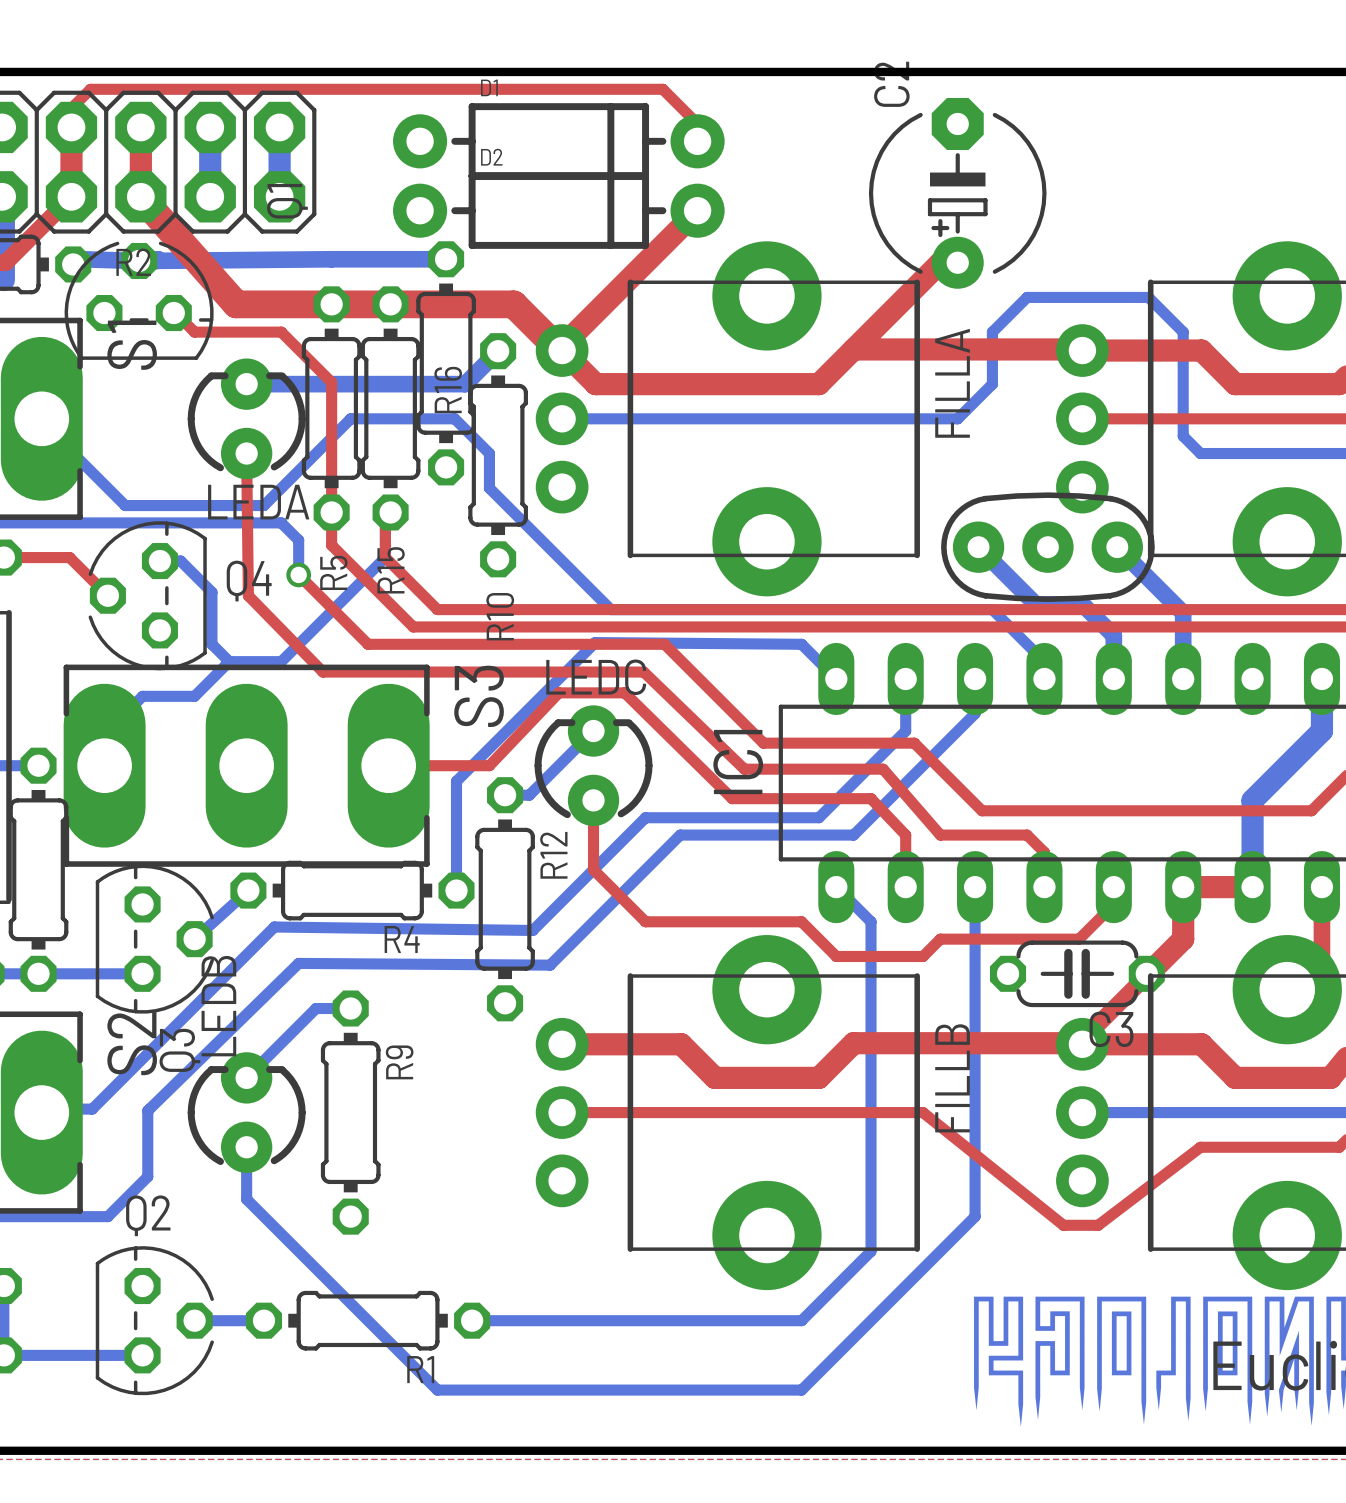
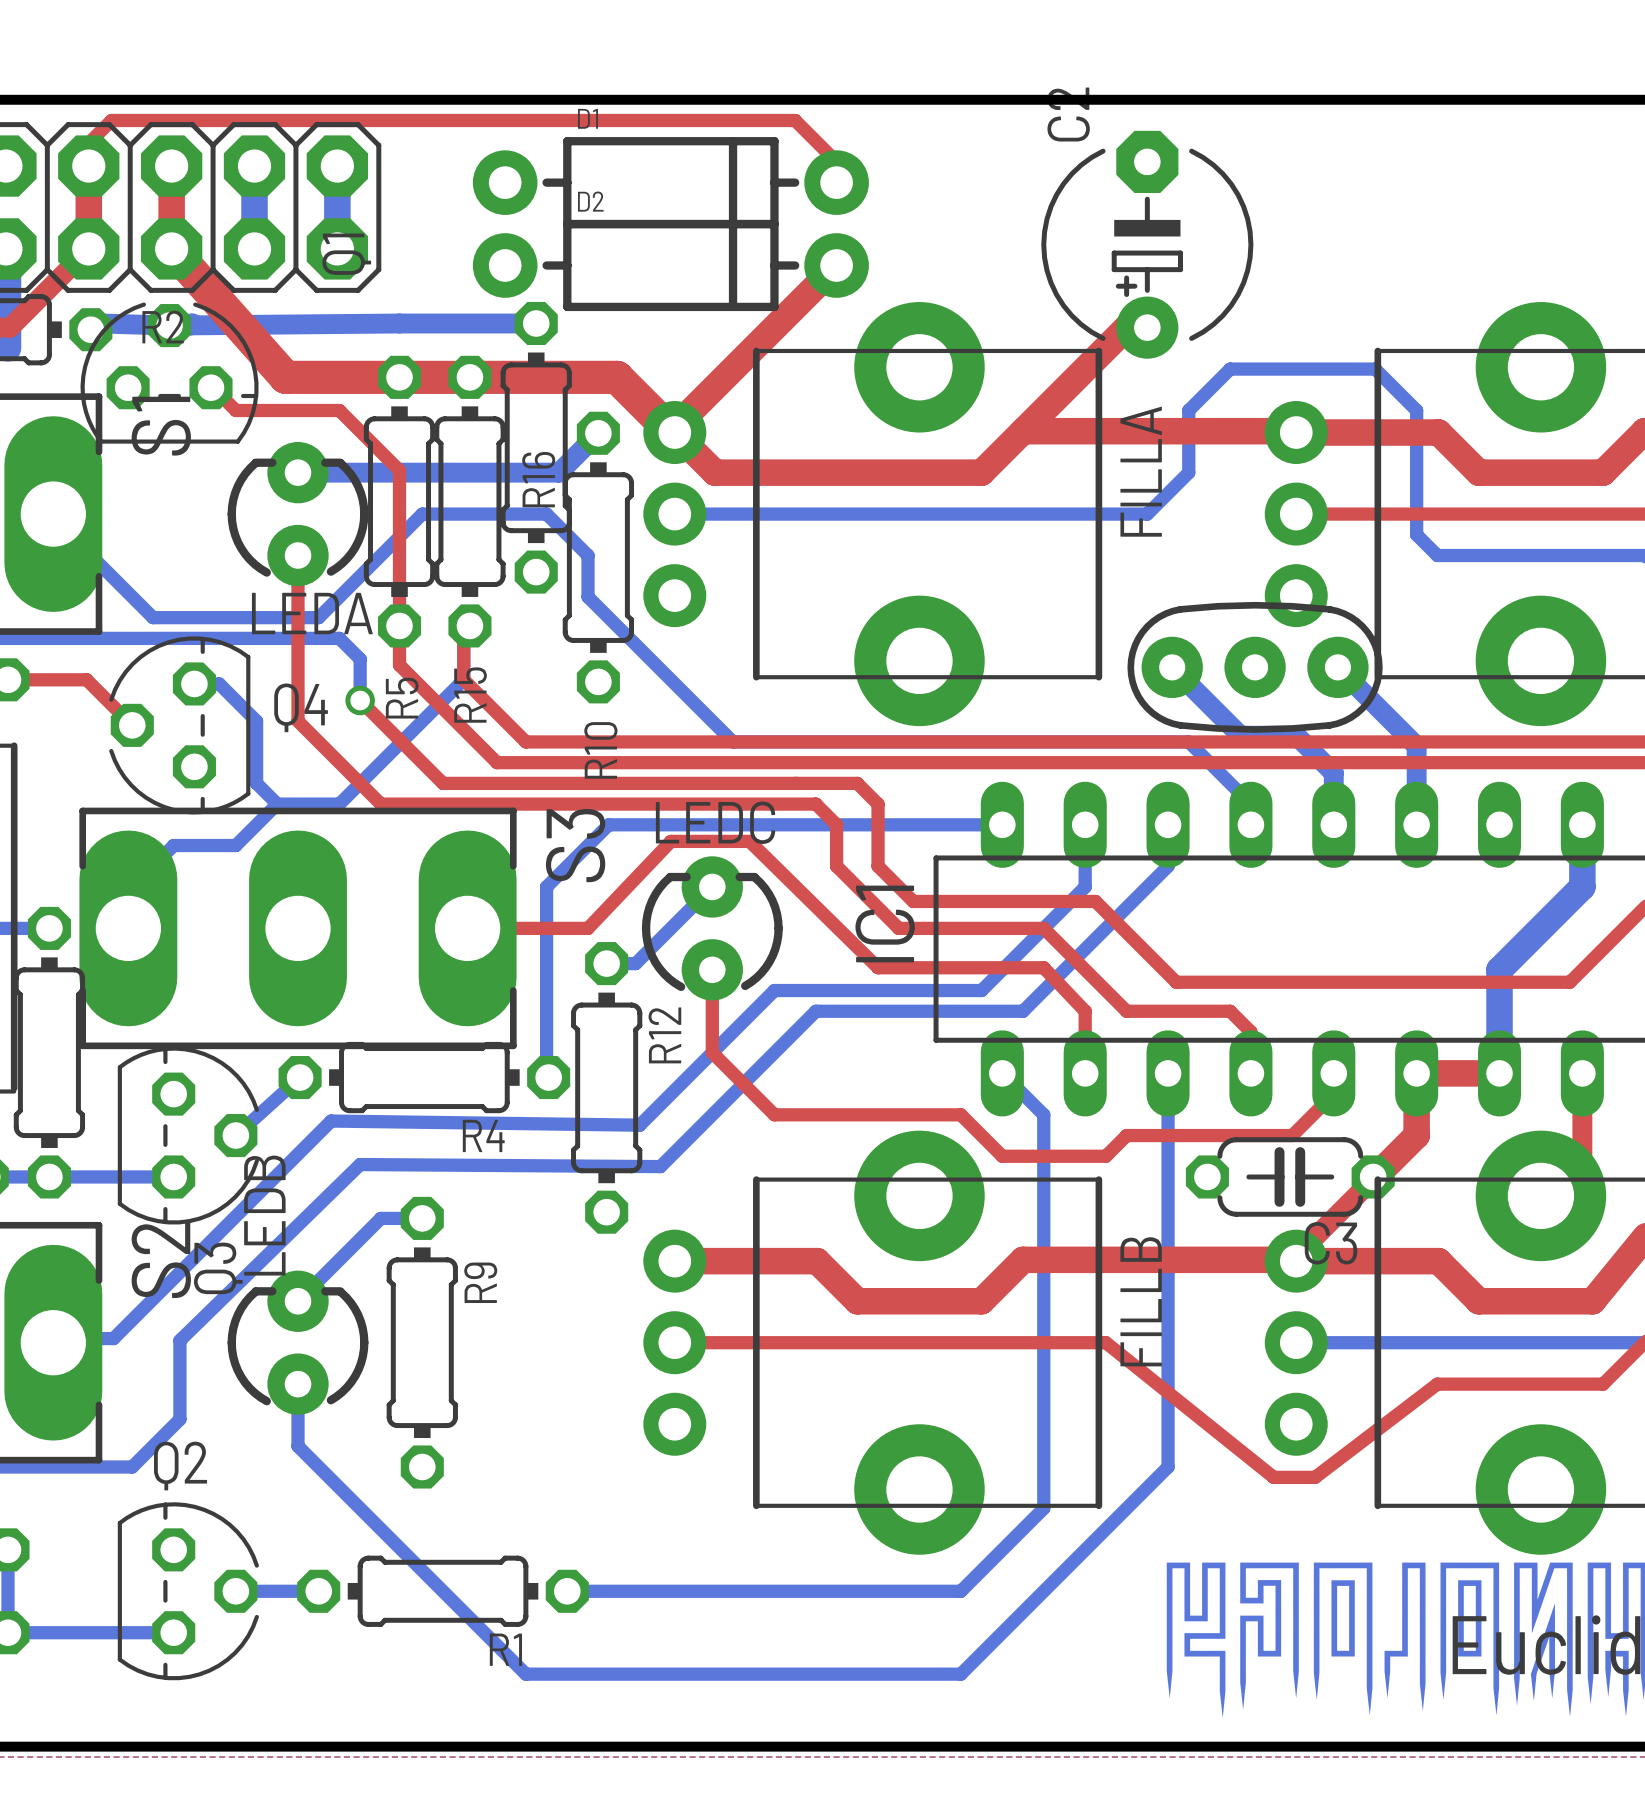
top track: (246, 453) (248, 595) (322, 672) (643, 672) (744, 769) (883, 769) (940, 835) -> (298, 555) (298, 721) (380, 804) (815, 804) (836, 824) (836, 866) (898, 928) (1043, 928) (1126, 1011)
top track: (664, 644) (763, 743) -> (797, 783) (857, 783) (878, 804) (878, 866) (915, 901)
bottom track: (836, 678) (801, 644) (595, 642) (456, 781) (456, 890) -> (1002, 824) (608, 824) (546, 886) (546, 1075) (548, 1077)

